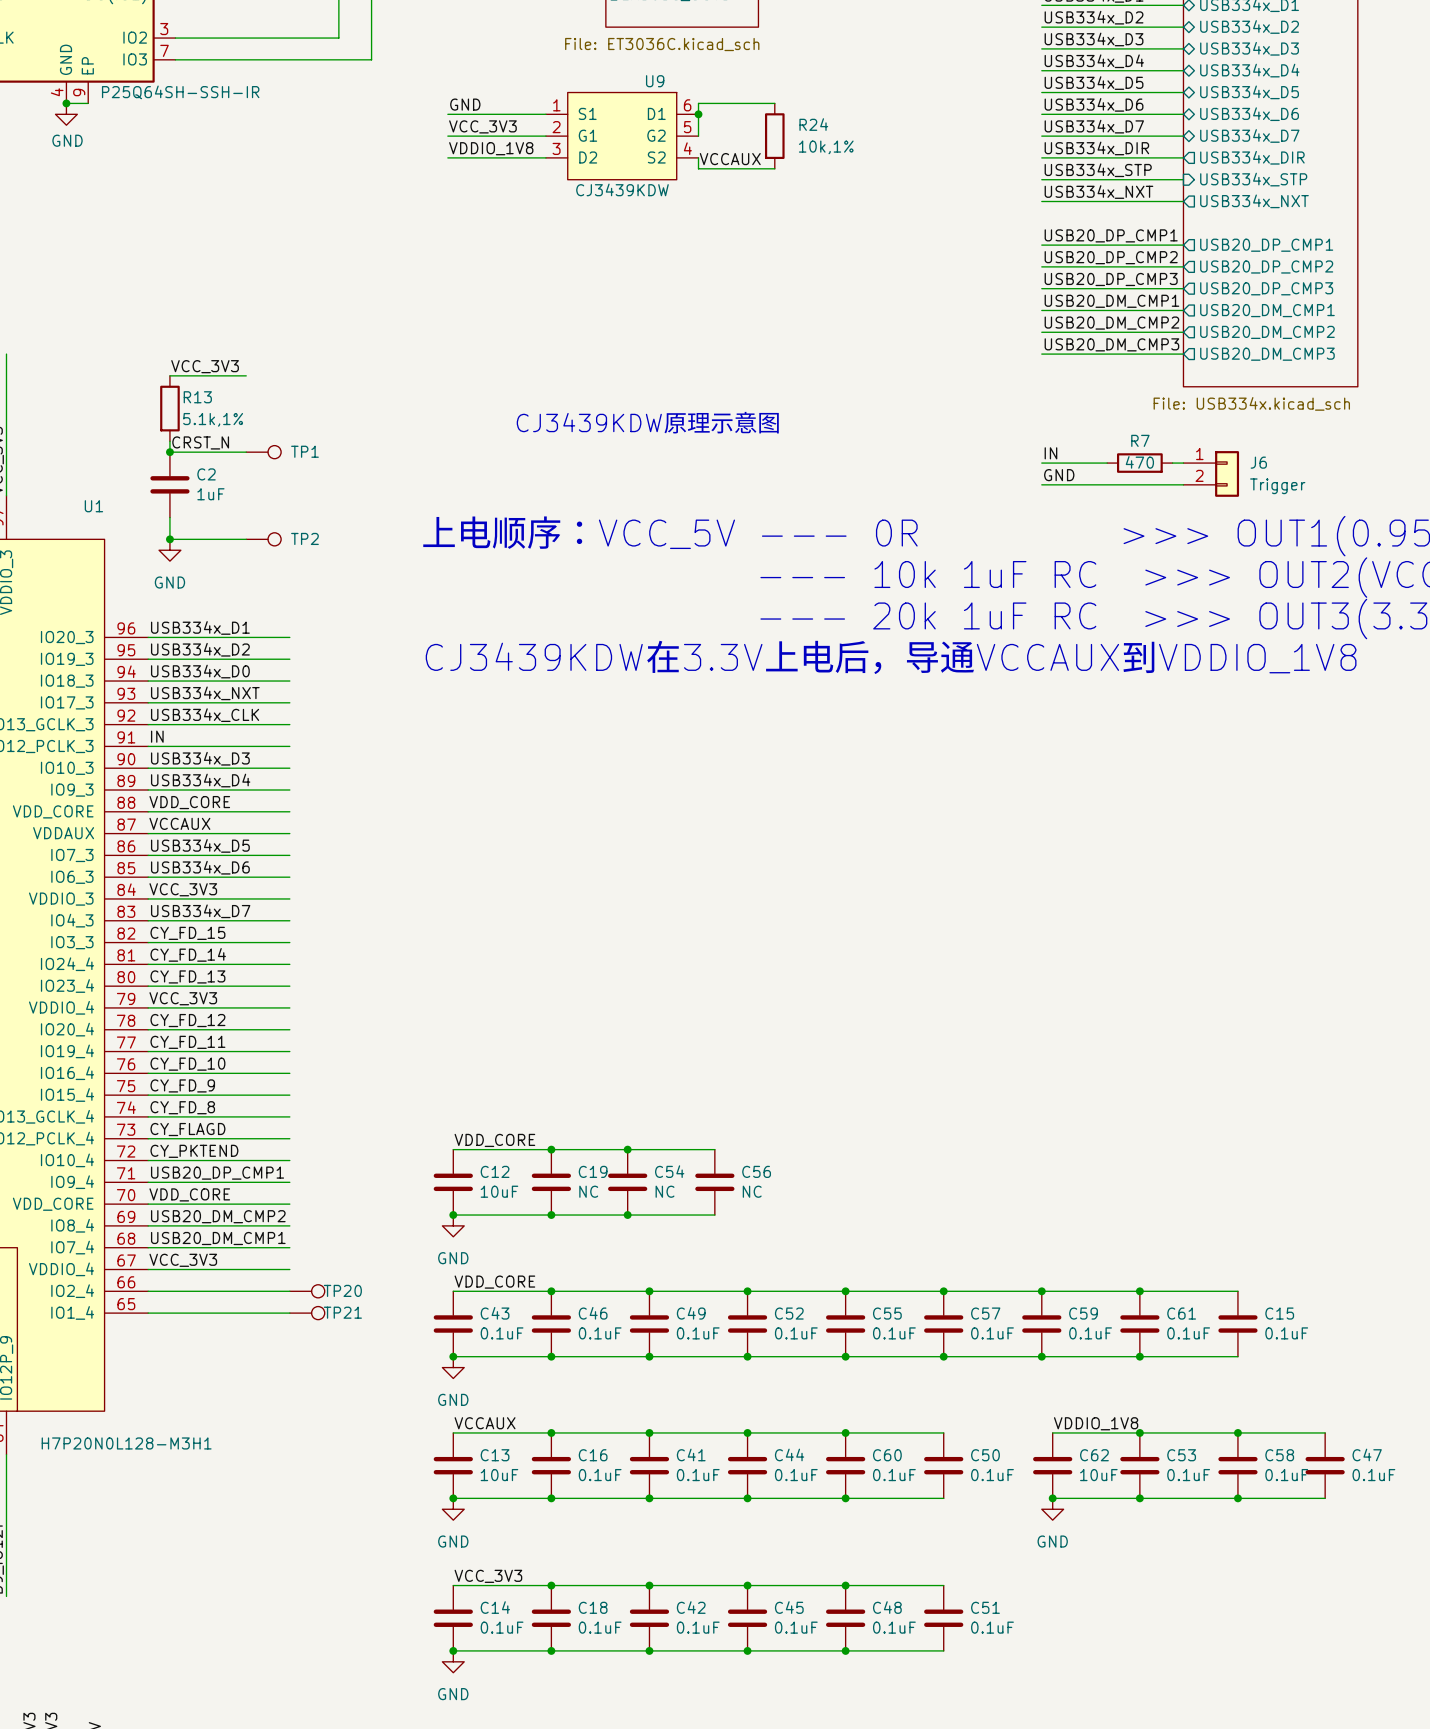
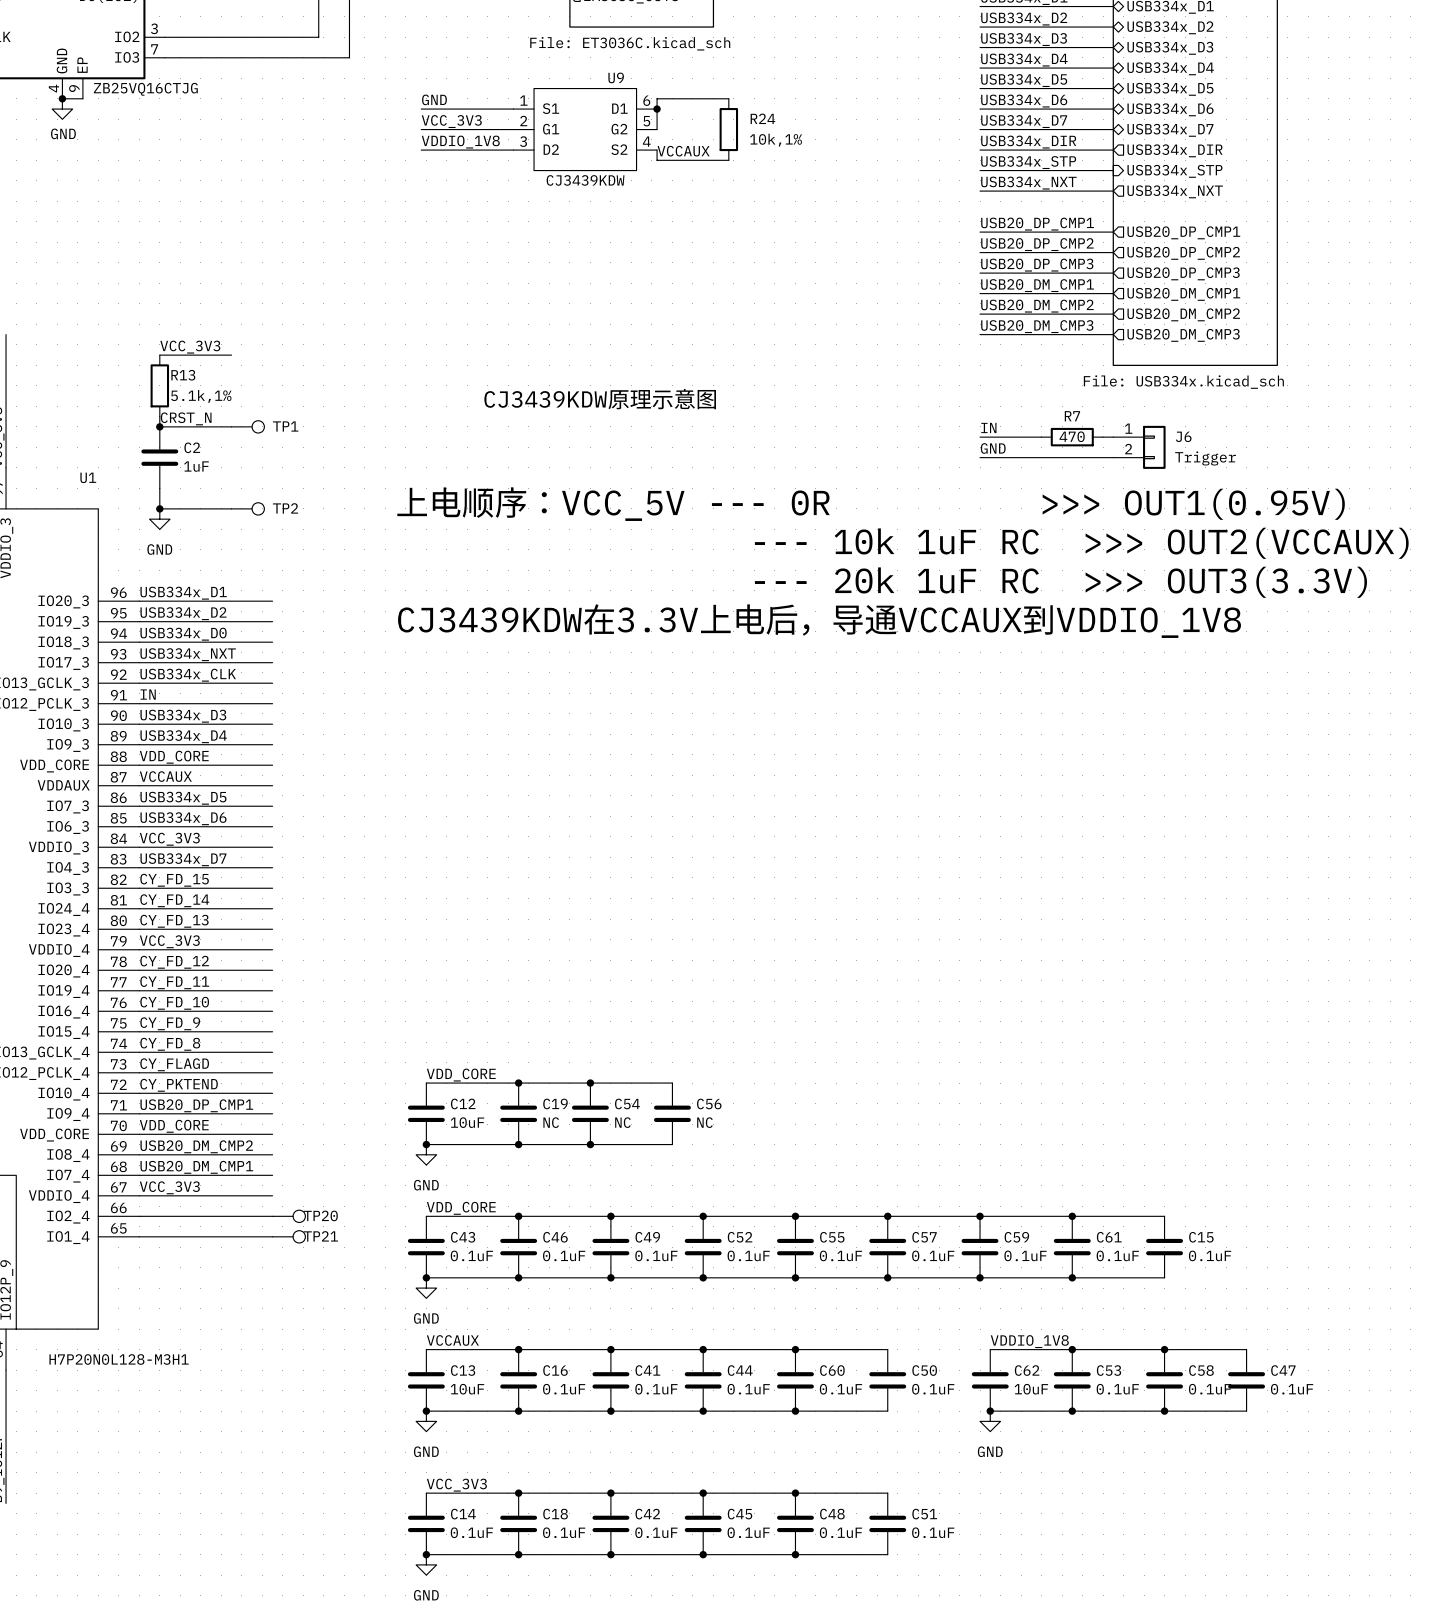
part value: P25Q64SH-SSH-IR (180, 92) -> ZB25VQ16CTJG (145, 89)

